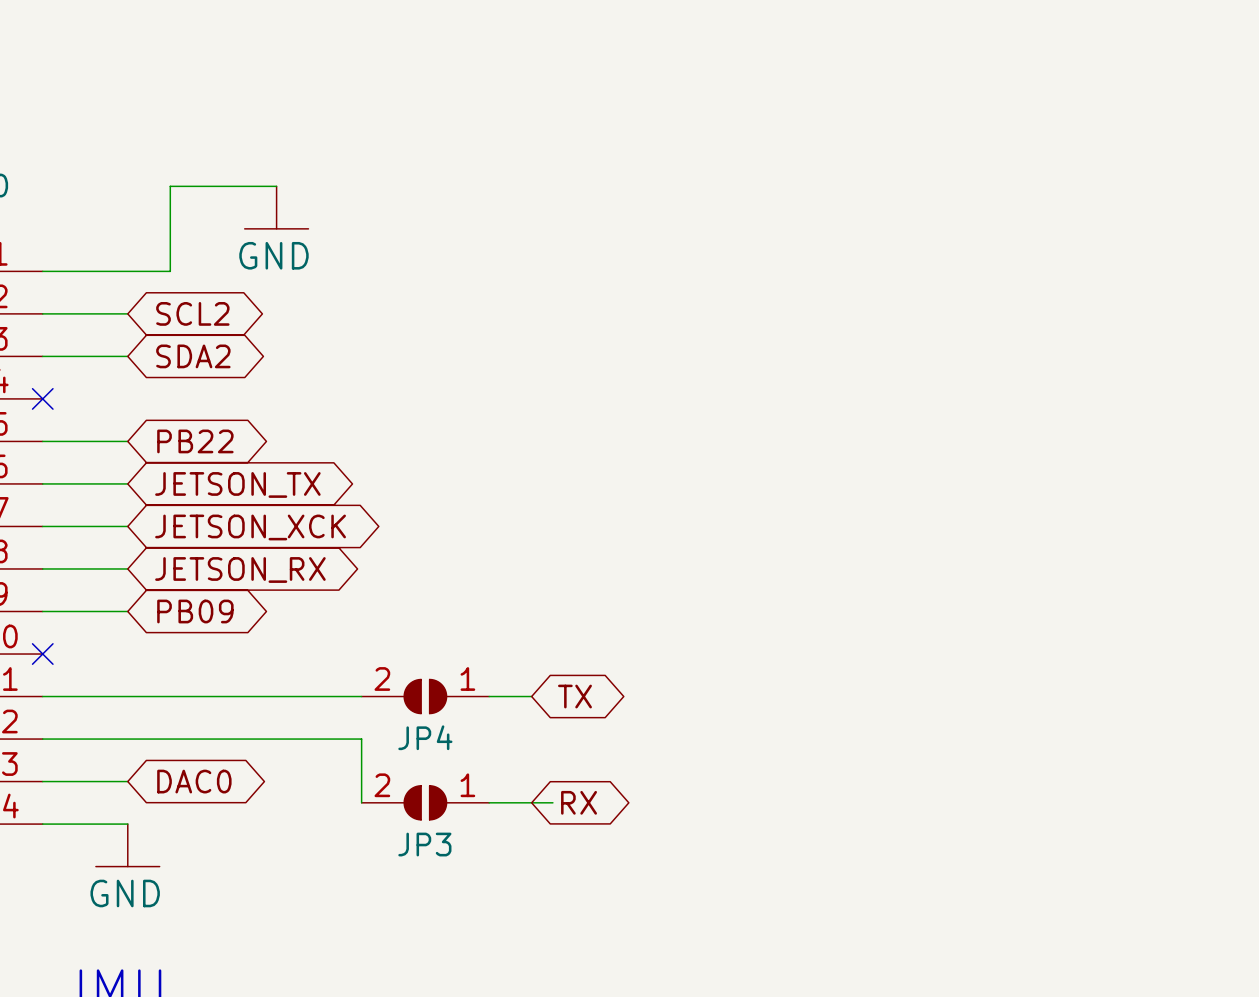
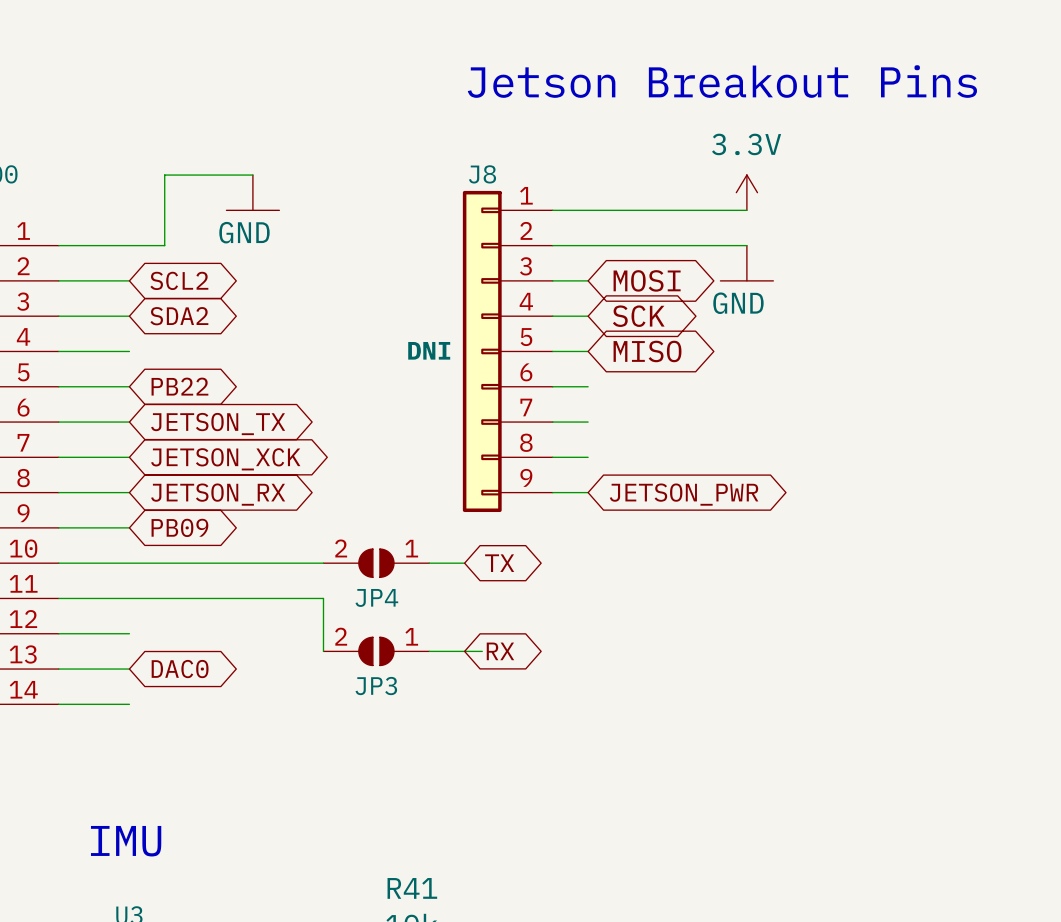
text: none -> Jetson Breakout Pins (722, 81)
power symbol: none -> 3.3V (746, 192)
wire: none -> (552, 210) (746, 210)
wire: none -> (552, 245) (746, 245)
power symbol: none -> GND (746, 263)
wire: none -> (552, 280) (588, 280)
global label: none -> MOSI (647, 280)
wire: none -> (552, 316) (588, 316)
global label: none -> SCK (638, 316)
wire: none -> (58, 351) (129, 351)
no-connect mark: (42, 398) -> none
J8: none -> (507, 351)
wire: none -> (552, 351) (588, 351)
global label: none -> MISO (647, 351)
wire: none -> (552, 386) (588, 386)
wire: none -> (552, 422) (588, 422)
wire: none -> (552, 457) (588, 457)
wire: none -> (552, 492) (588, 492)
global label: none -> JETSON_PWR (684, 494)
wire: none -> (58, 563) (323, 563)
no-connect mark: (42, 654) -> none
JP4 position: (425, 696) -> (376, 563)
wire: (489, 696) (531, 696) -> (429, 563) (464, 563)
global label position: TX (574, 696) -> TX (499, 563)
wire: (127, 739) (361, 739) -> (323, 598) (323, 633)
wire: (361, 760) (361, 802) -> none
JP3 position: (425, 802) -> (376, 651)
wire: (489, 802) (552, 802) -> (429, 651) (482, 651)
global label position: RX (579, 802) -> RX (500, 651)
power symbol: GND (127, 845) -> none

